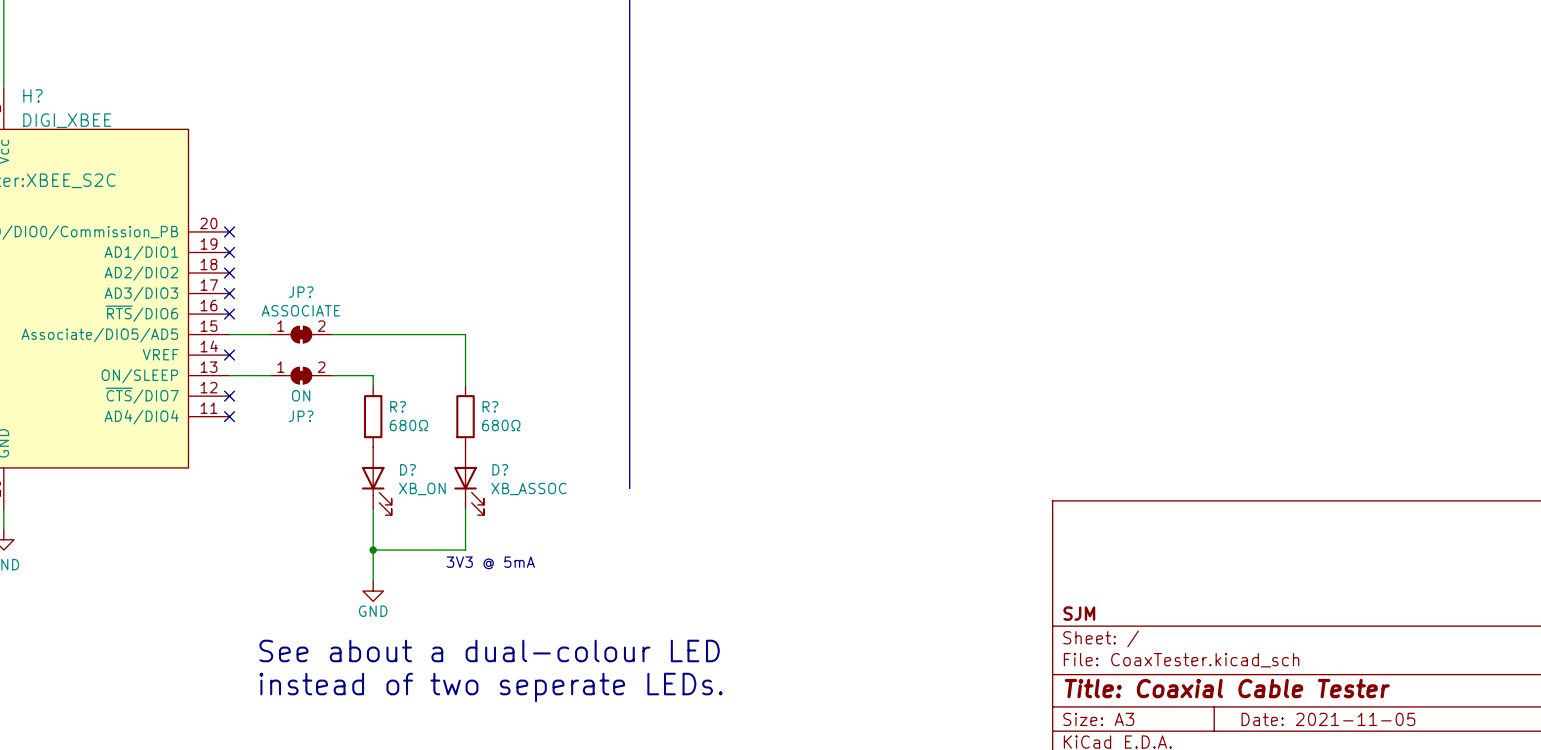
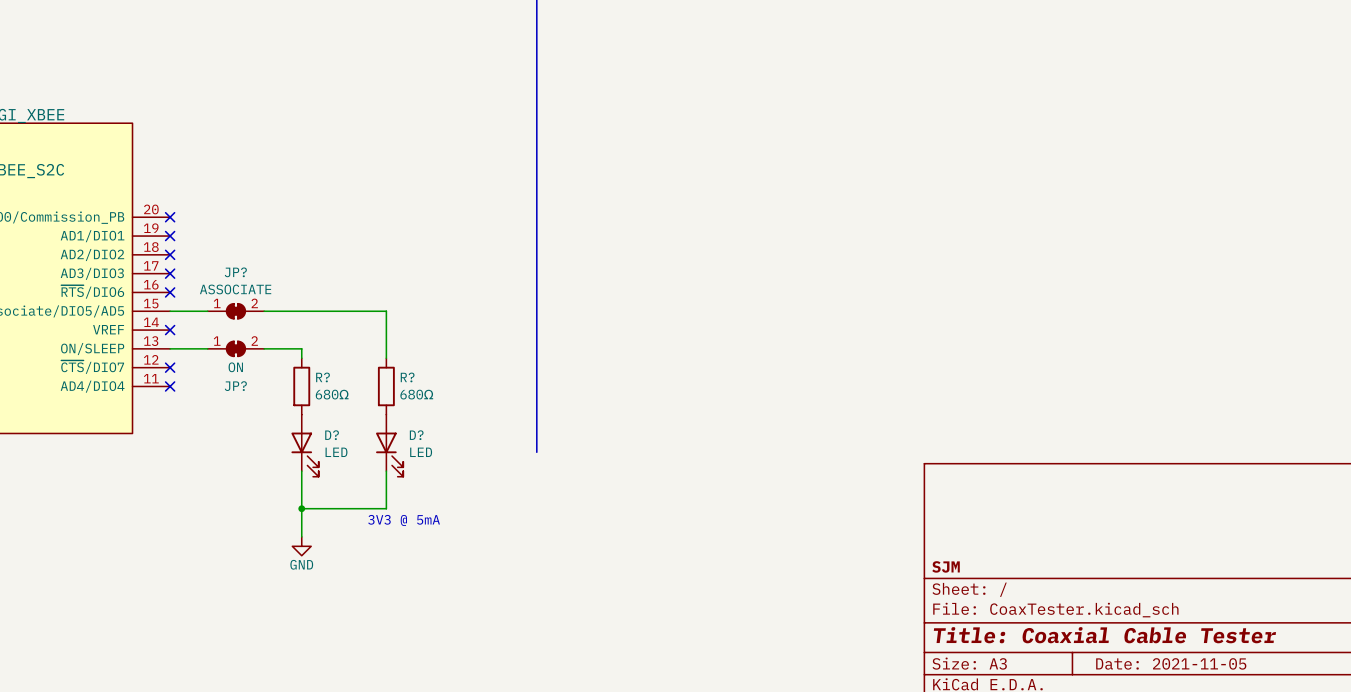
D? value: XB_ON (422, 488) -> LED (336, 452)
D? value: XB_ASSOC (528, 488) -> LED (421, 452)
text: See about a dual-colour LED (489, 650) -> none
text: instead of two seperate LEDs. (491, 687) -> none

